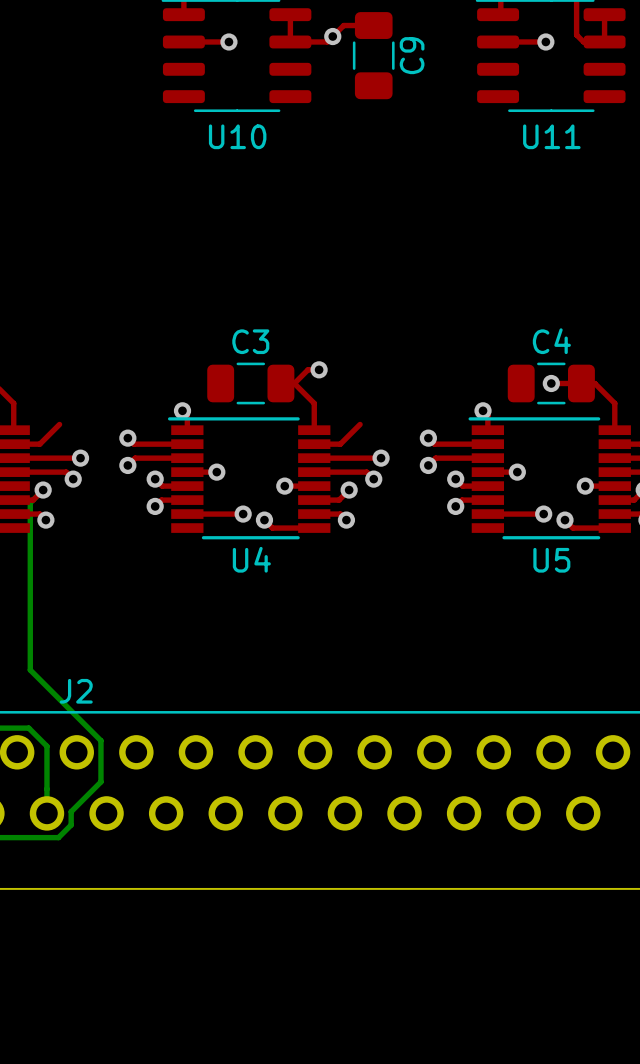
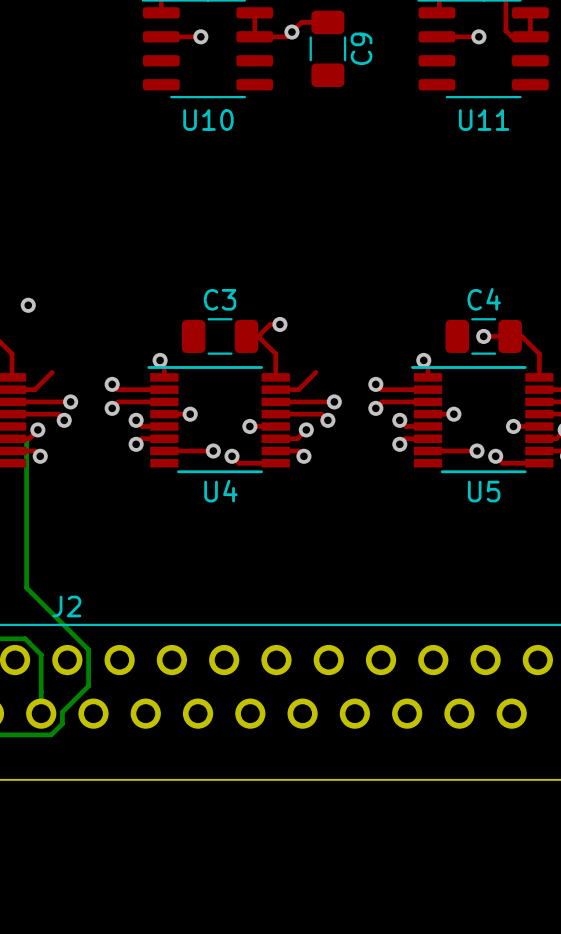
via: none -> (28, 305)

